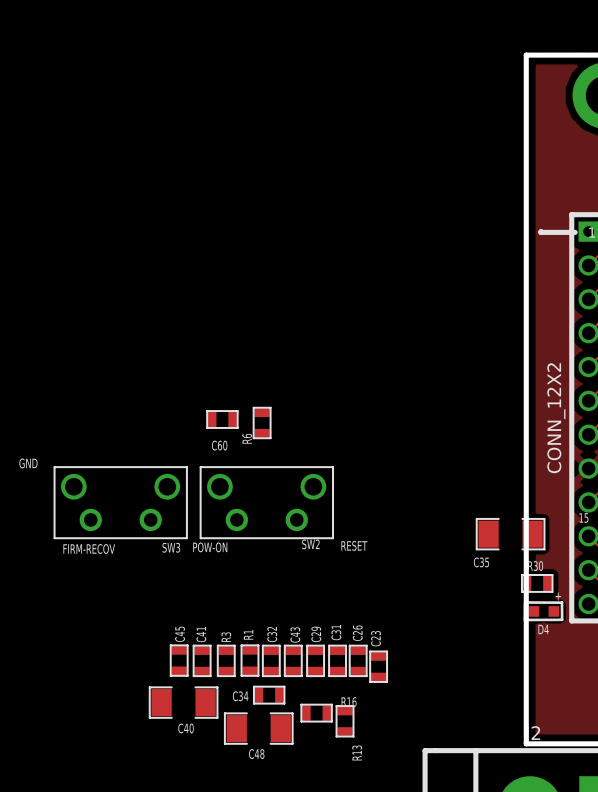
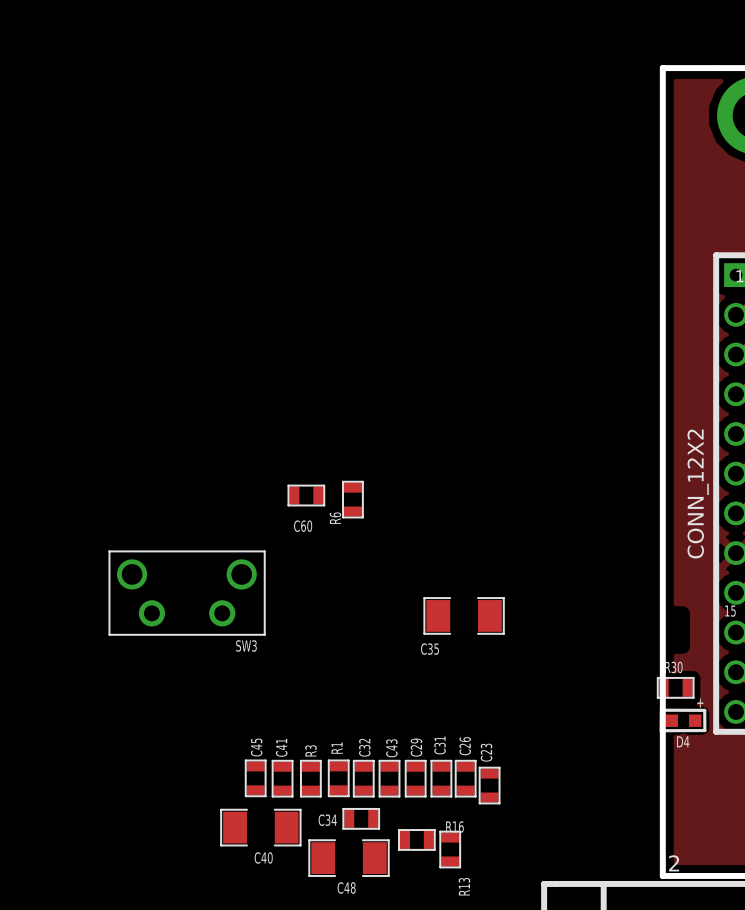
line: (540, 231) (575, 232) -> none
text: GND (28, 463) -> none
SW2: (266, 502) -> none
C35 position: (510, 534) -> (464, 615)
text: RESET (354, 545) -> none
text: POW-ON (210, 547) -> none
text: FIRM-RECOV (89, 549) -> none

